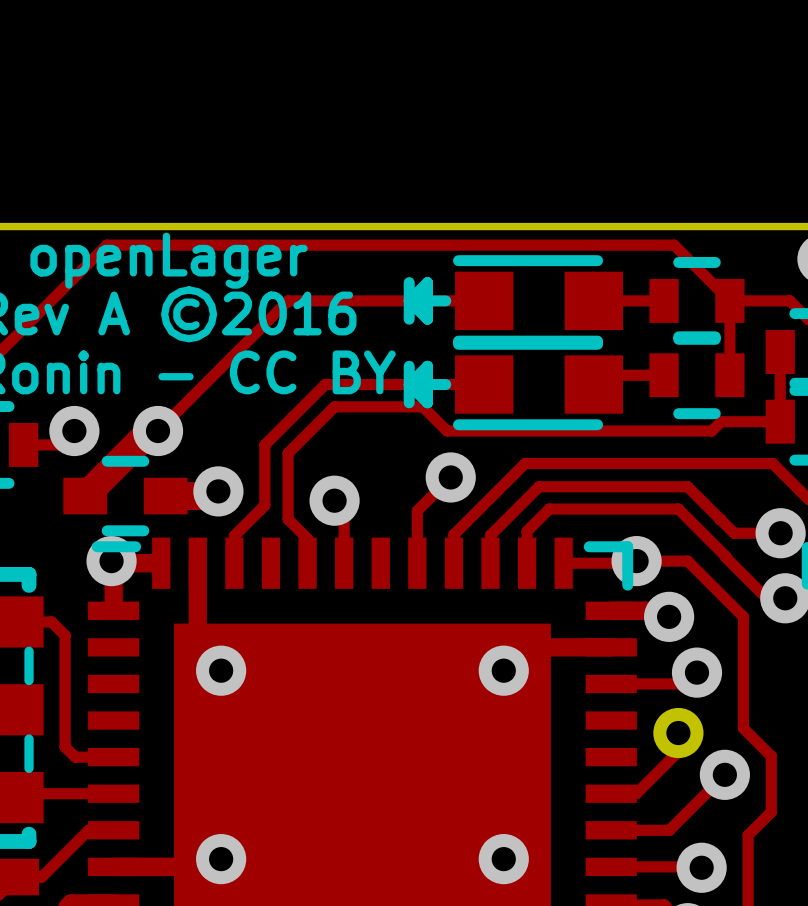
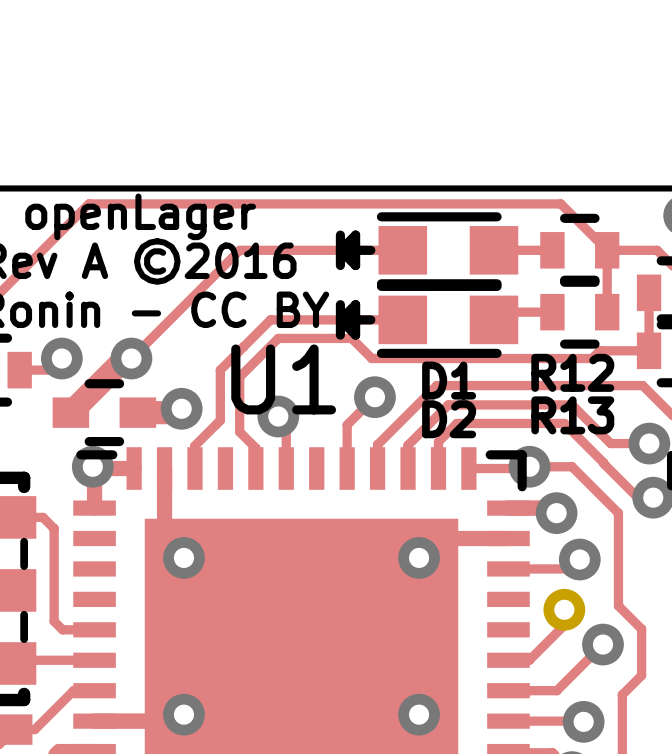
R12 name: none -> R12 (572, 372)
U1 name: none -> U1 (283, 379)
D1 name: none -> D1 (449, 380)
R13 name: none -> R13 (572, 415)
D2 name: none -> D2 (449, 419)

